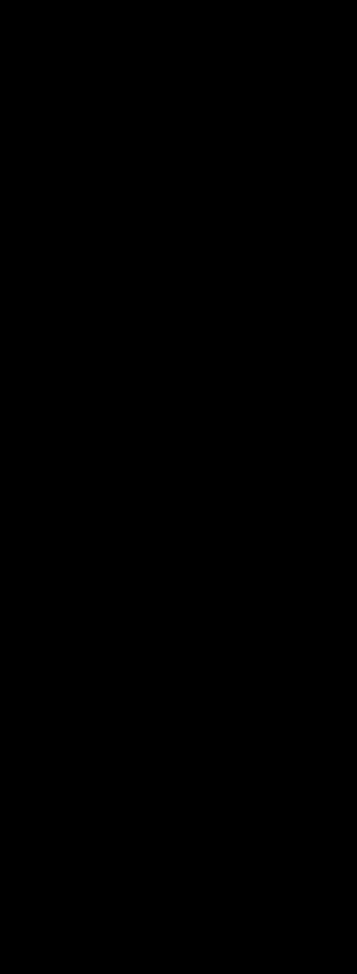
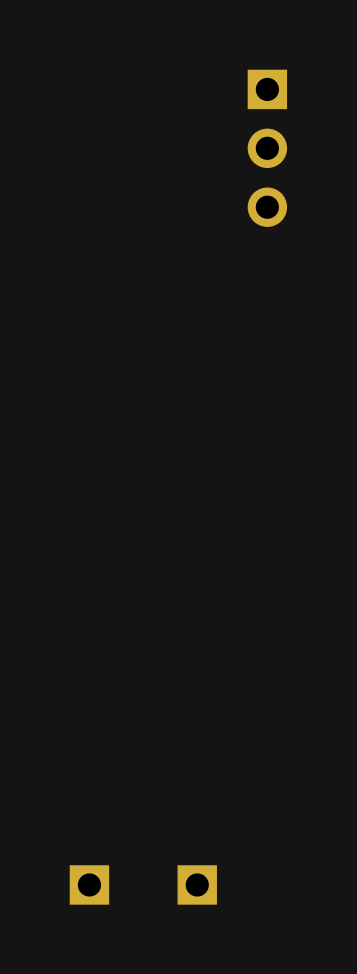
part: none -> (267, 148)
part: none -> (89, 884)
part: none -> (197, 884)

